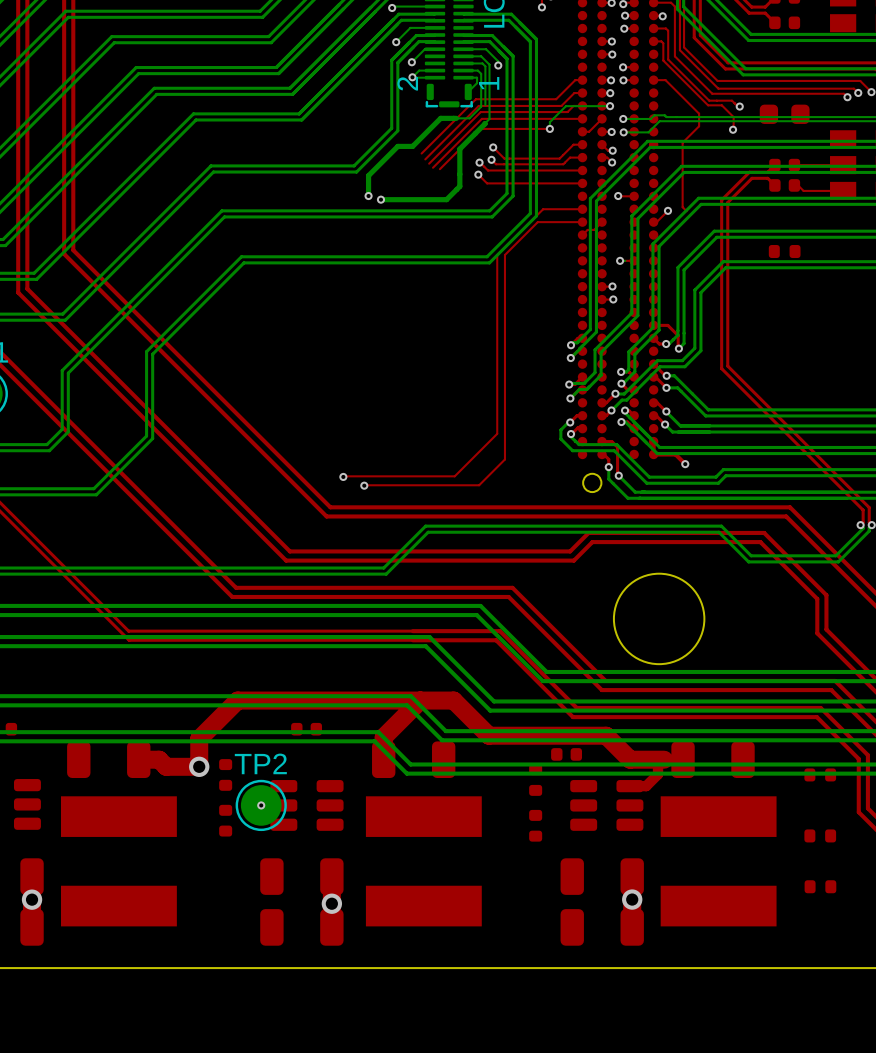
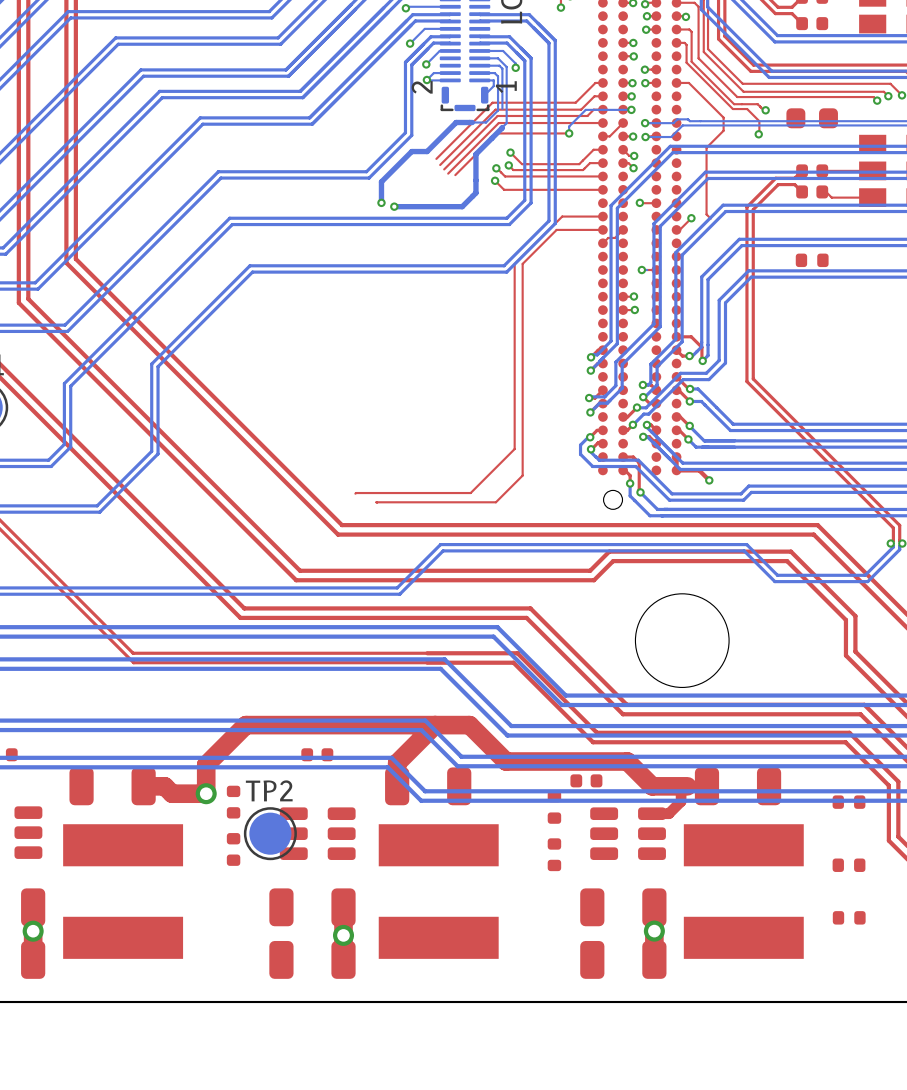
via: (343, 476) -> none
via: (364, 485) -> none
via: (261, 805) -> none

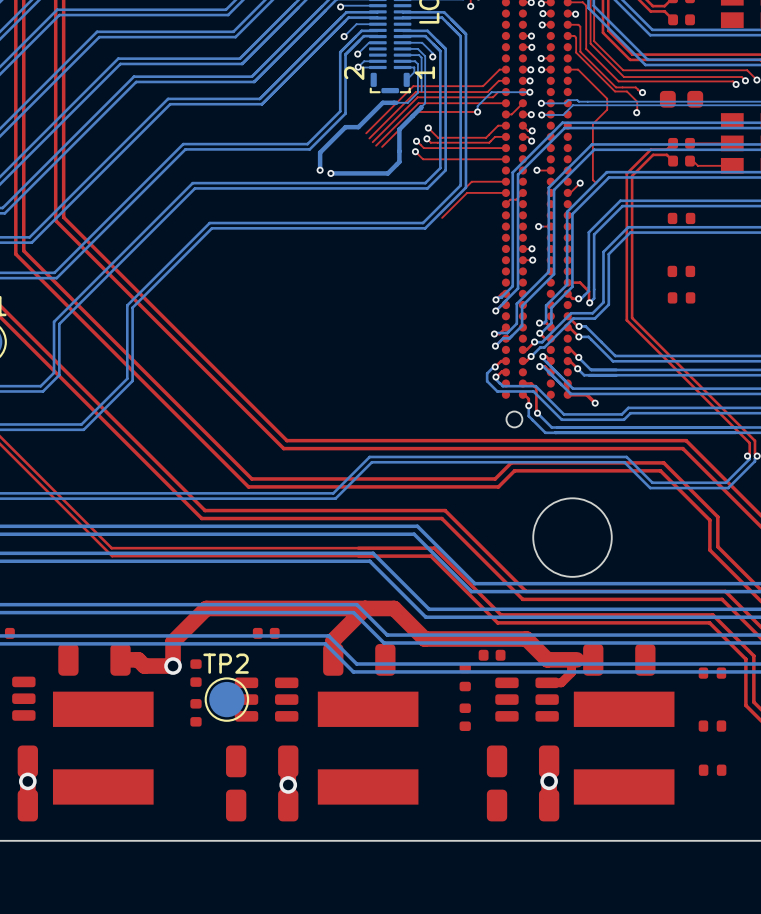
top track: (522, 256) (514, 264) (514, 449) (470, 493) (355, 493) -> none
top track: (526, 259) (522, 263) (522, 475) (495, 502) (376, 502) -> none
part: none -> (681, 271)
part: none -> (681, 297)
top track: (376, 502) (377, 502) -> none

